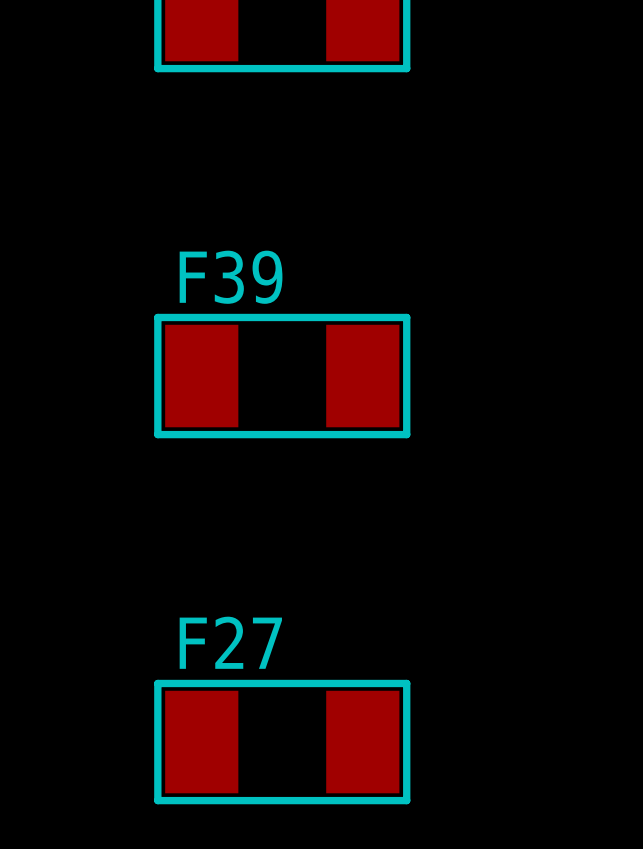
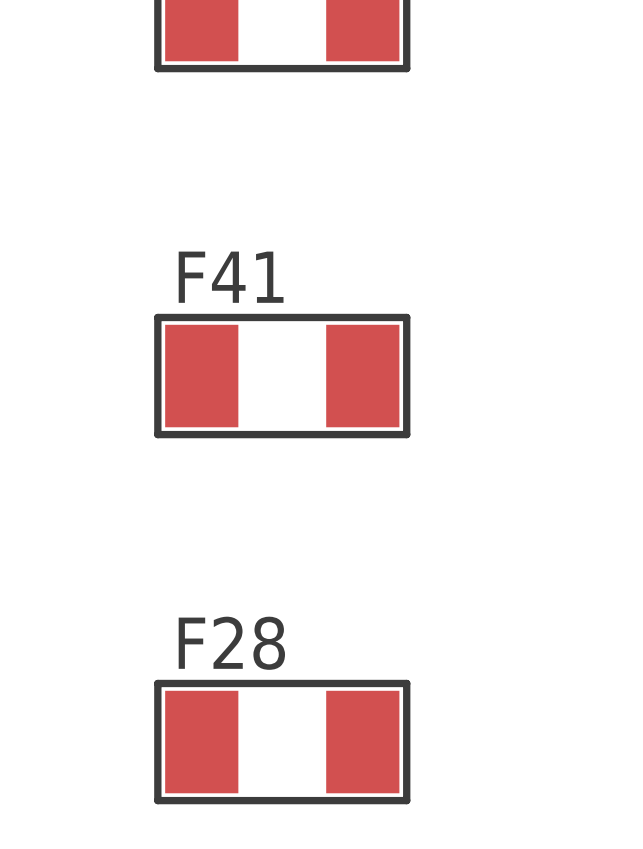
F39 name: F39 (231, 277) -> F41 (231, 277)
F27 name: F27 (230, 642) -> F28 (231, 643)

